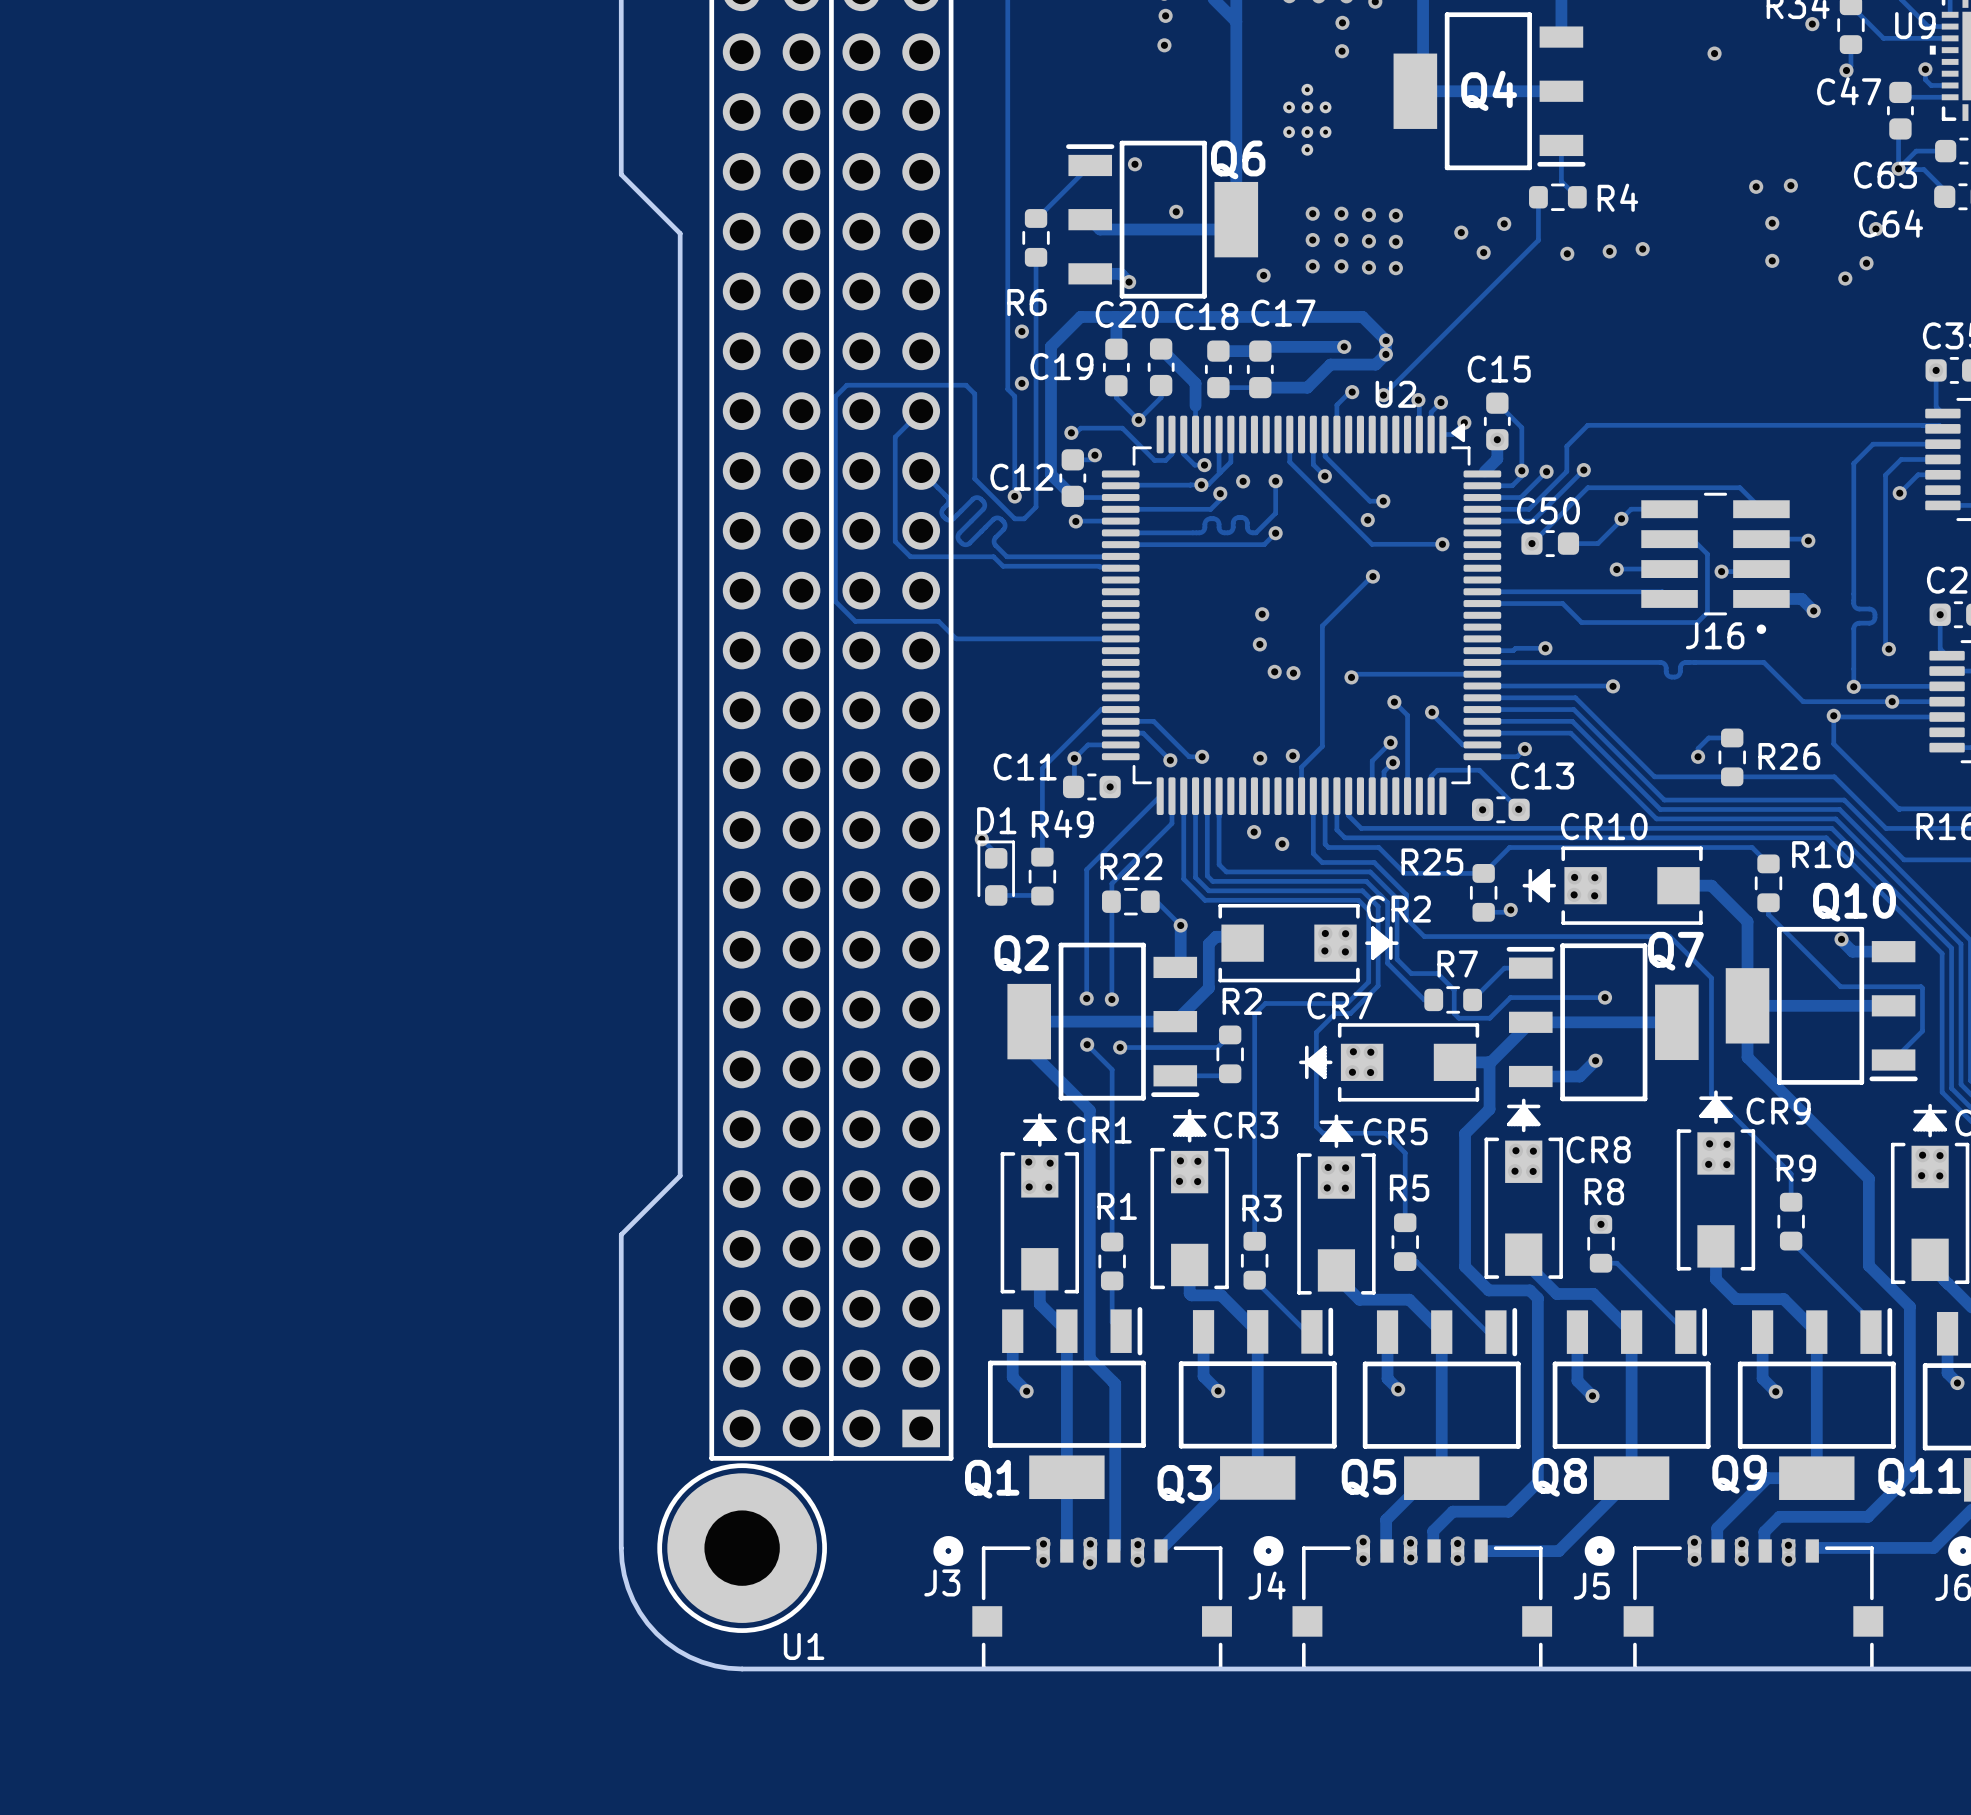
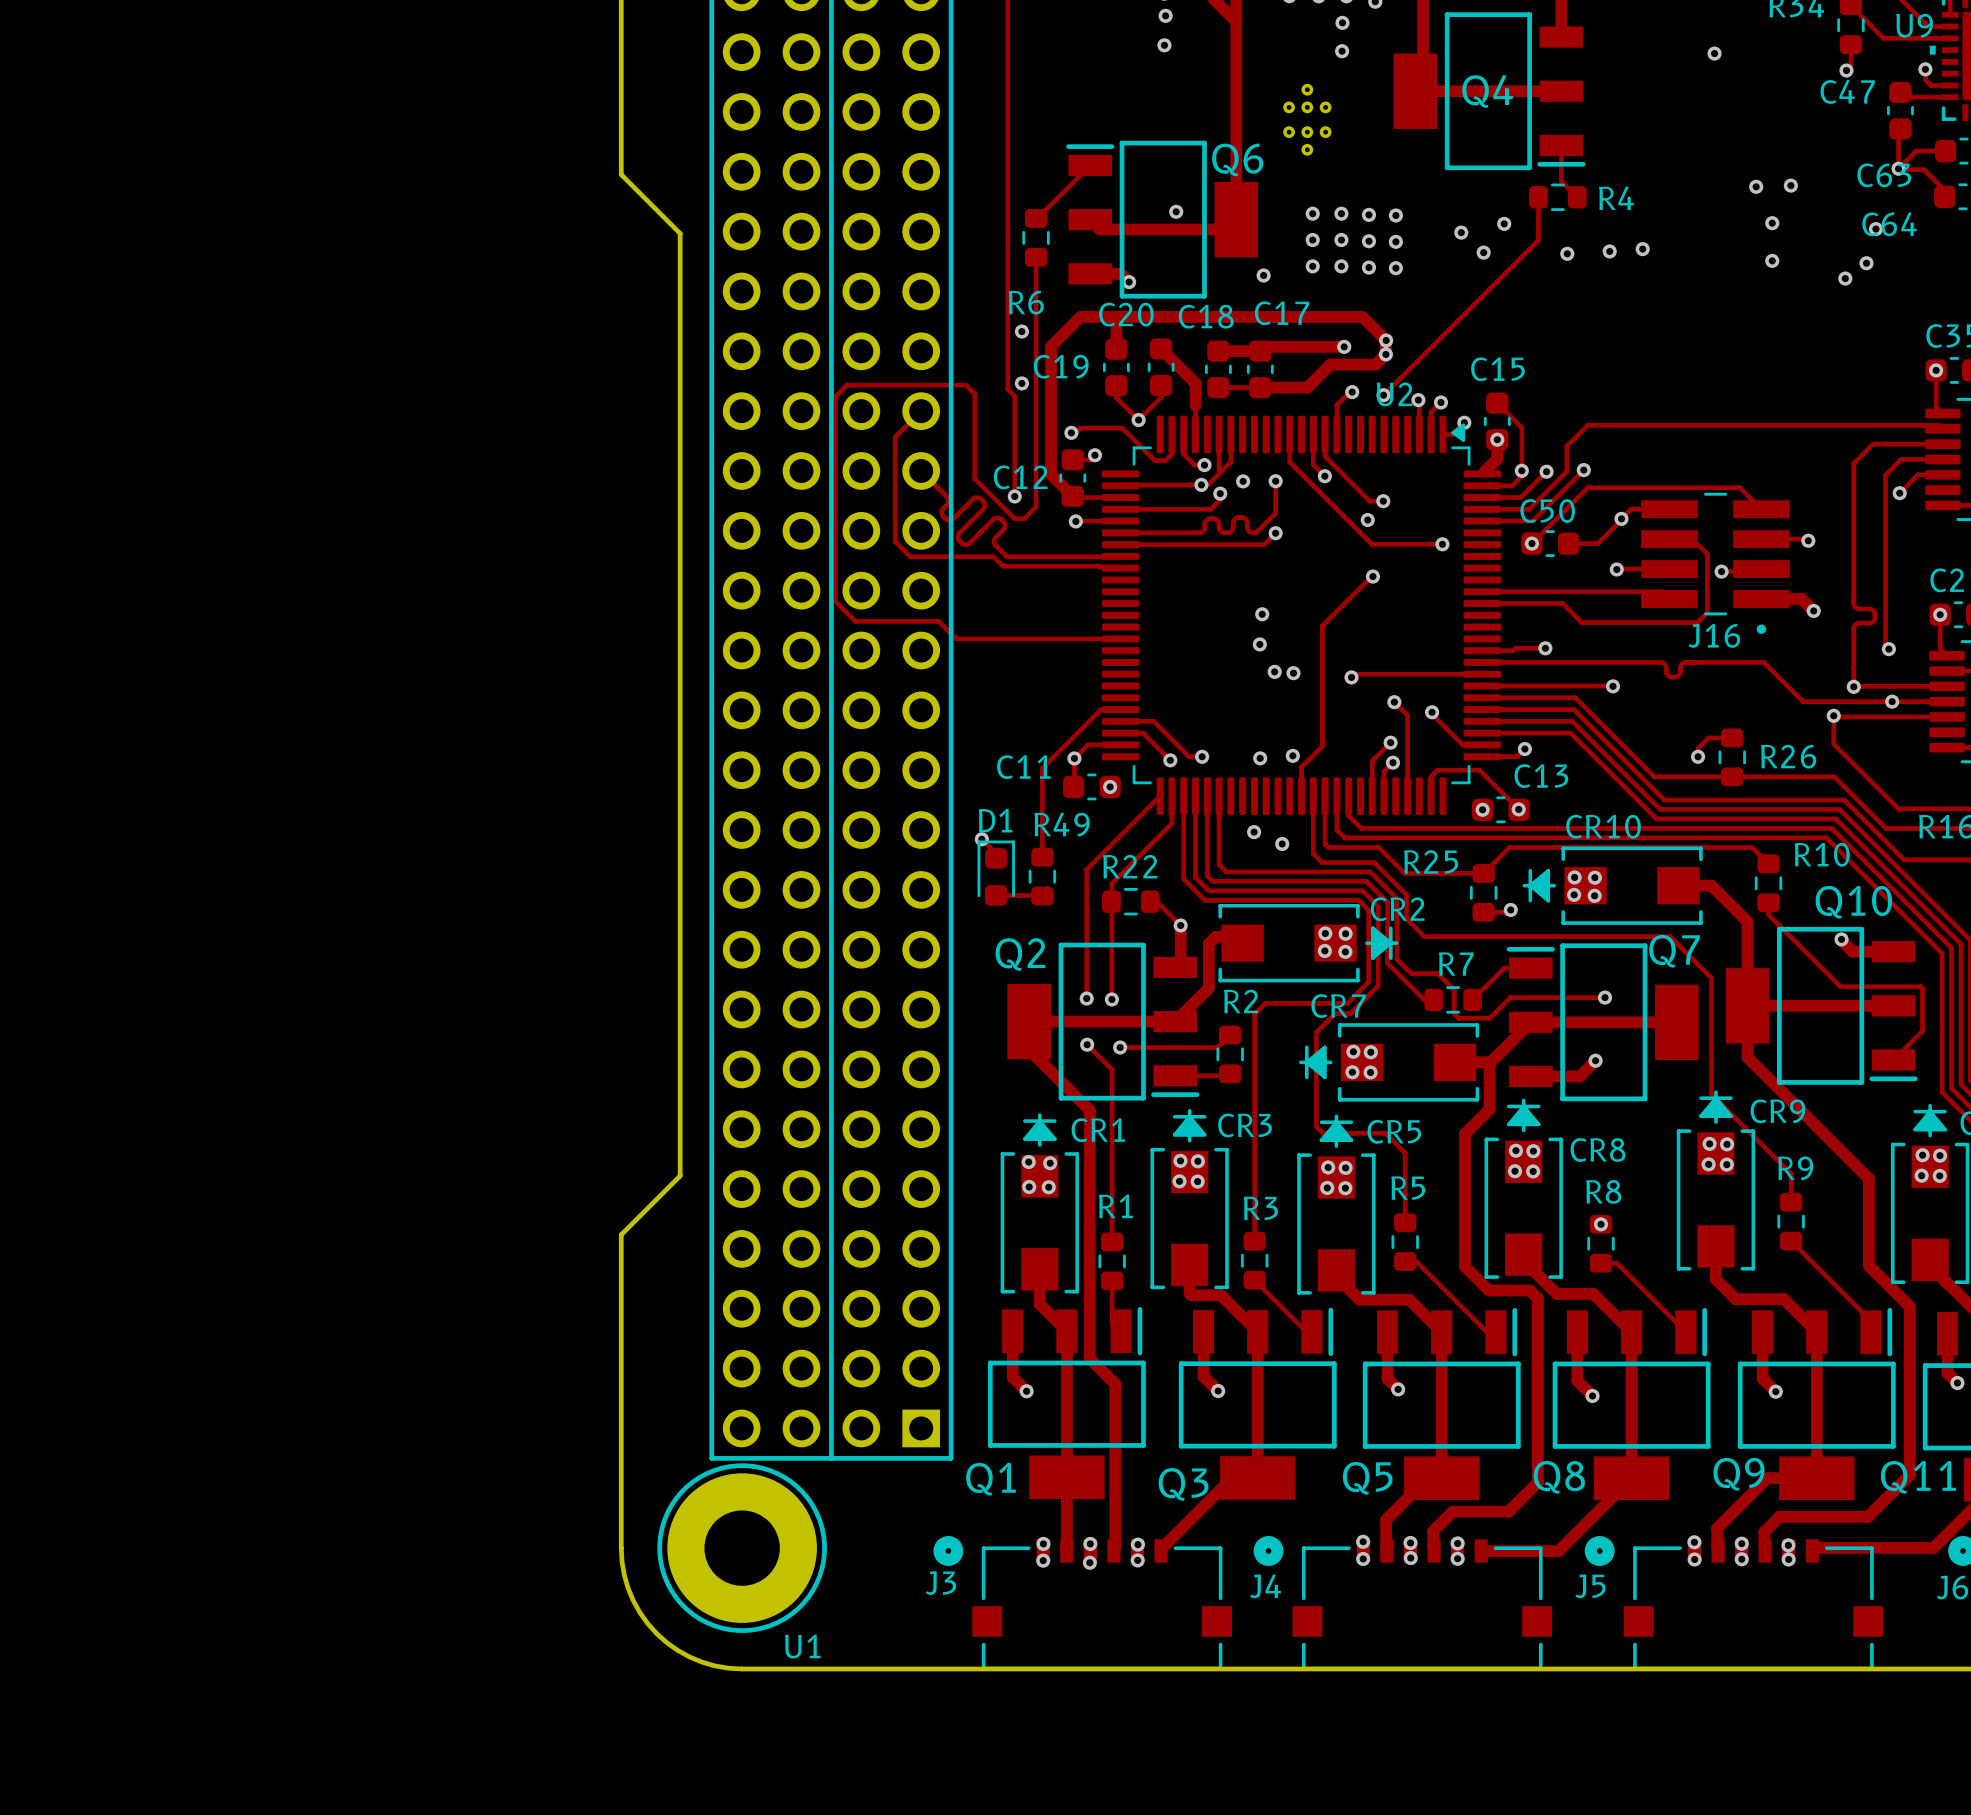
via: (1812, 24) -> none
via: (1134, 164) -> none

